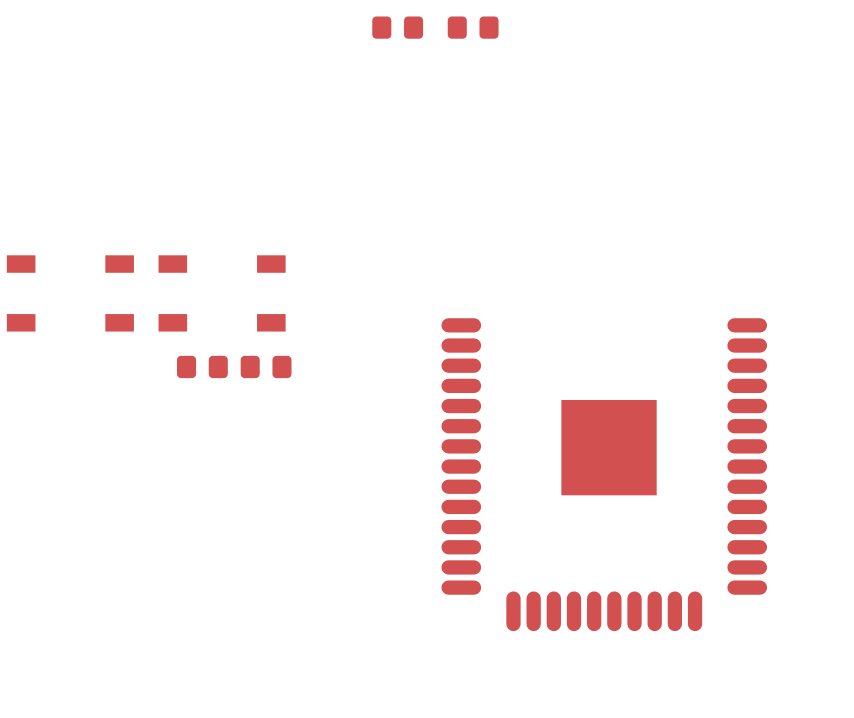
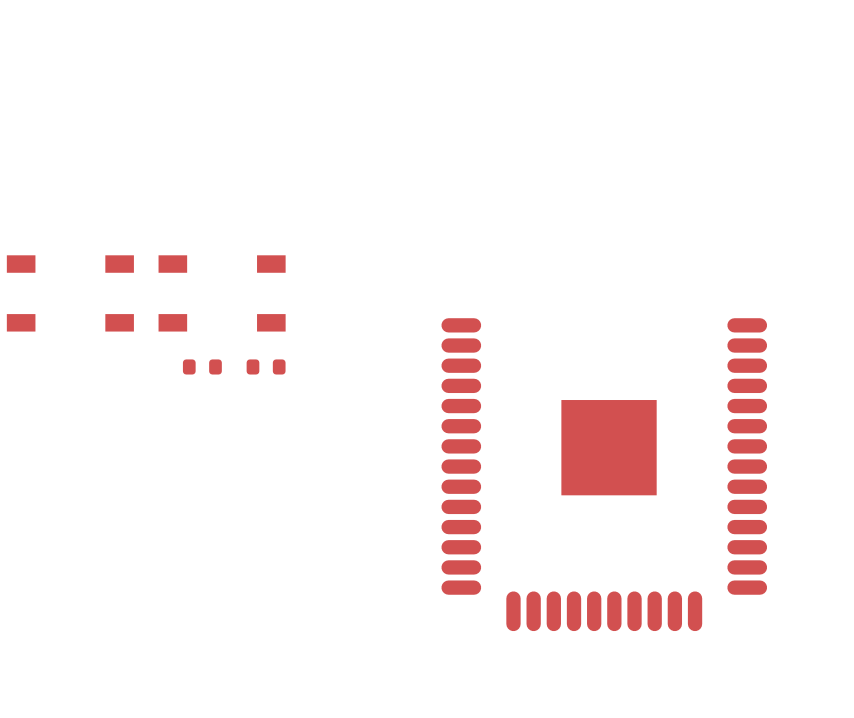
part: (397, 27) -> none
part: (473, 27) -> none
part footprint: [176, 355, 228, 379] -> [182, 359, 222, 375]
part footprint: [240, 355, 292, 379] -> [246, 359, 286, 375]

